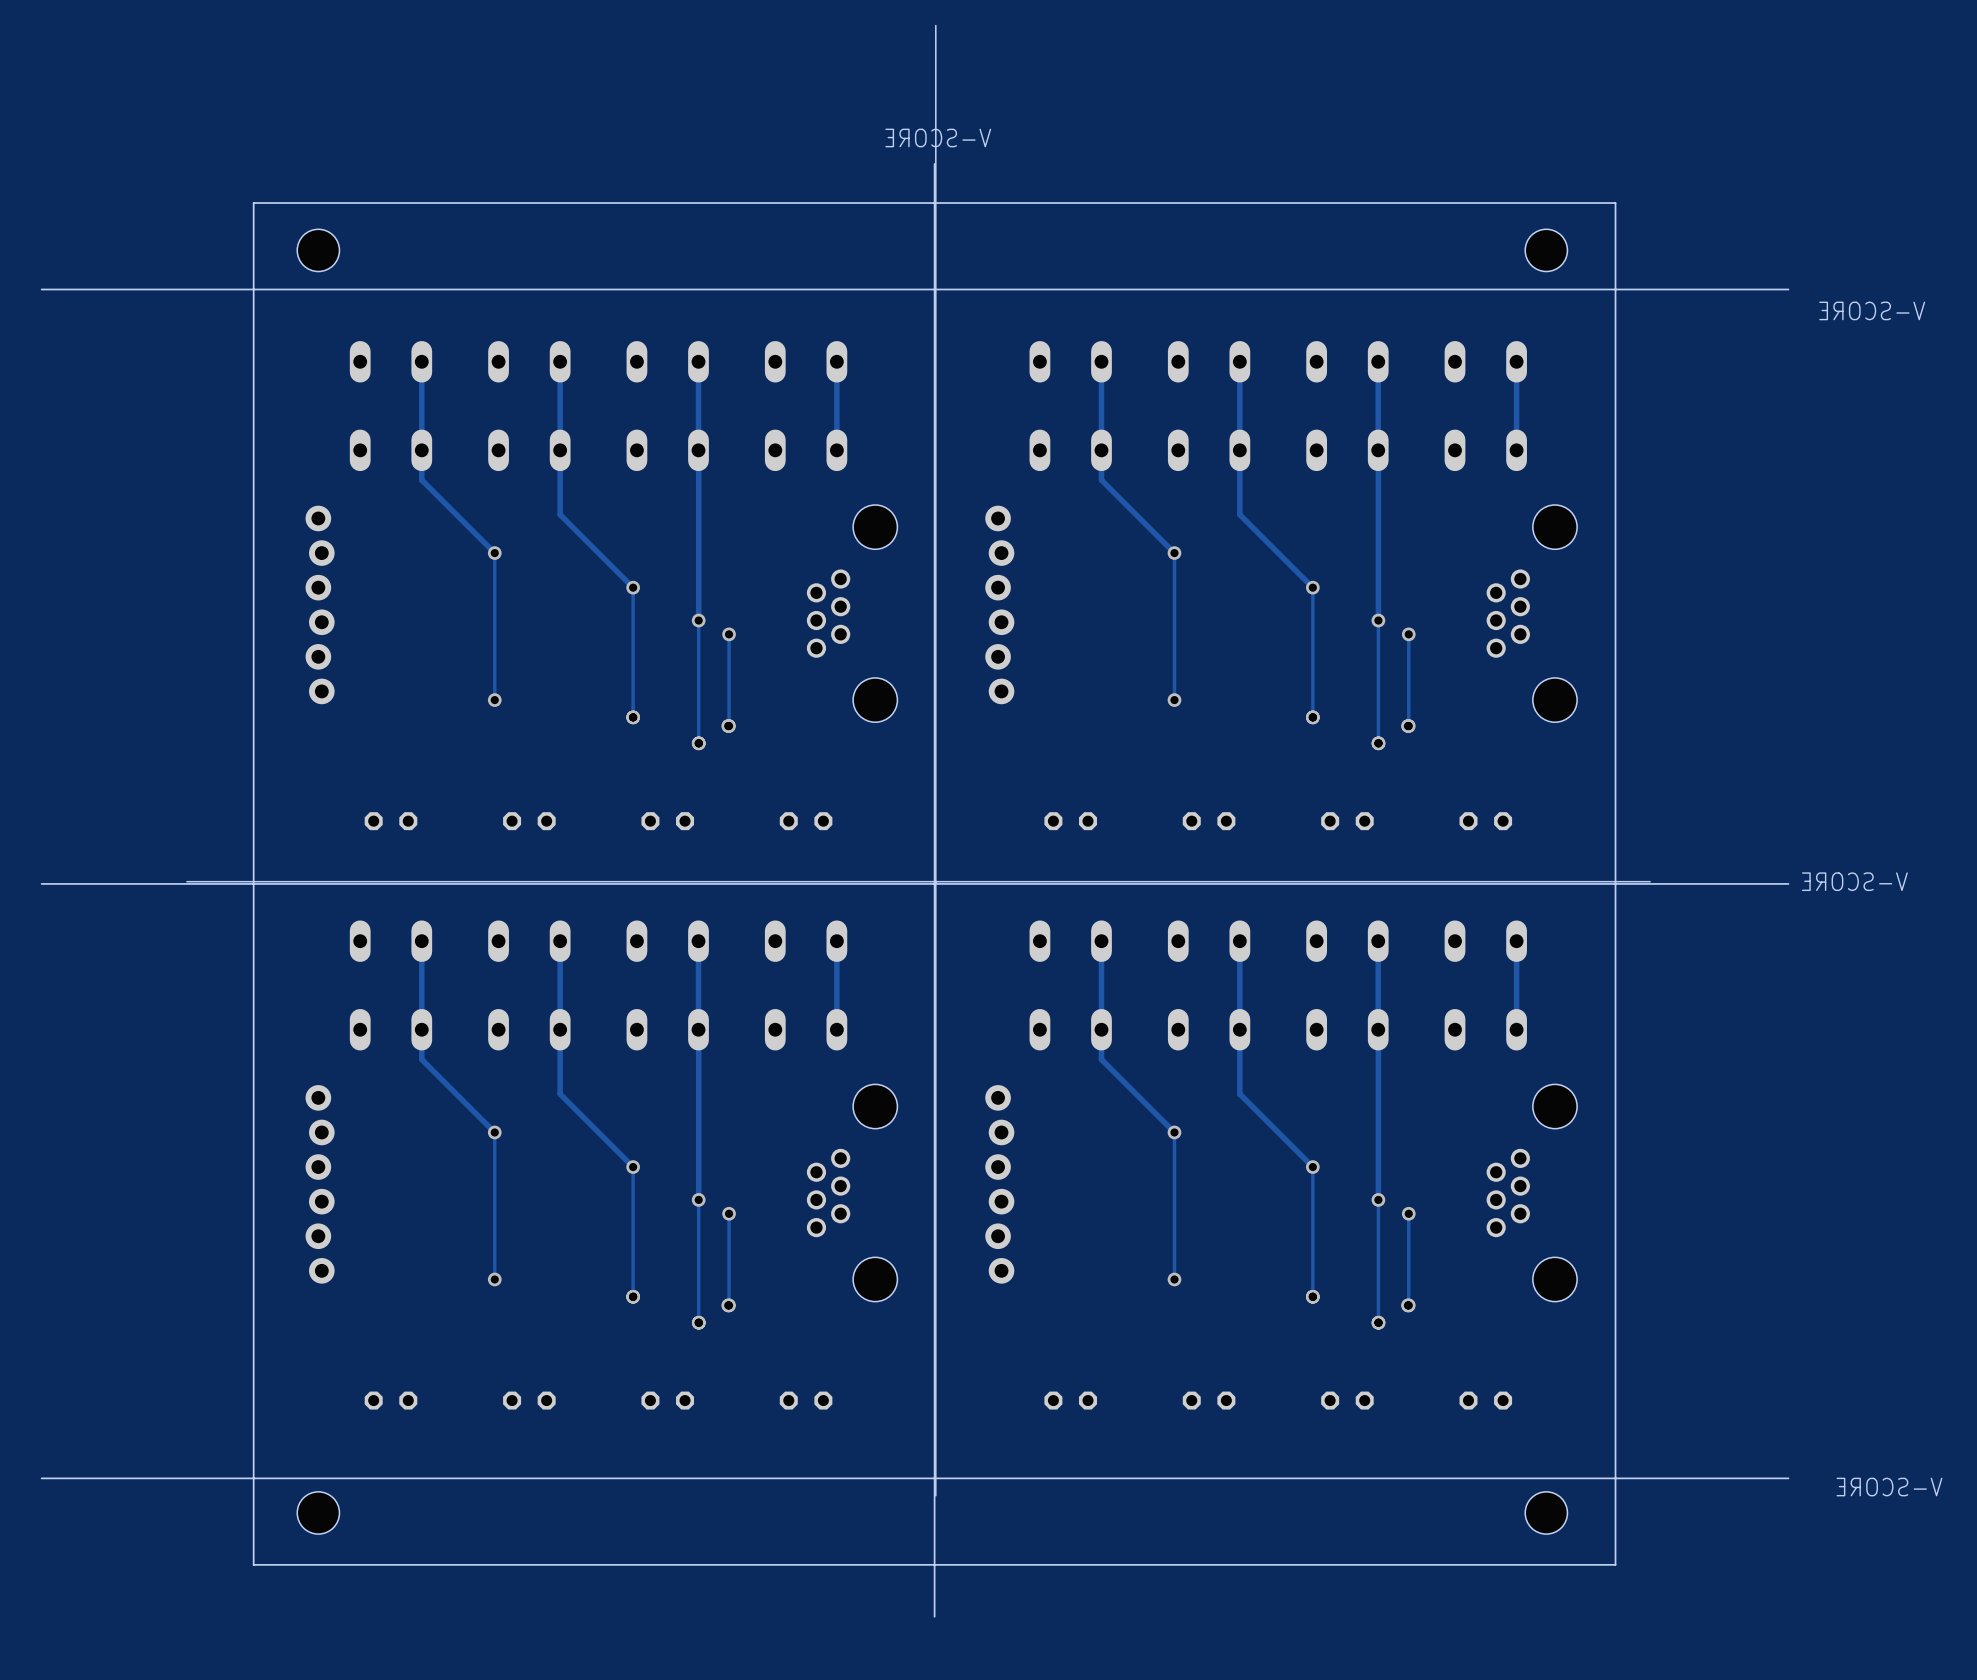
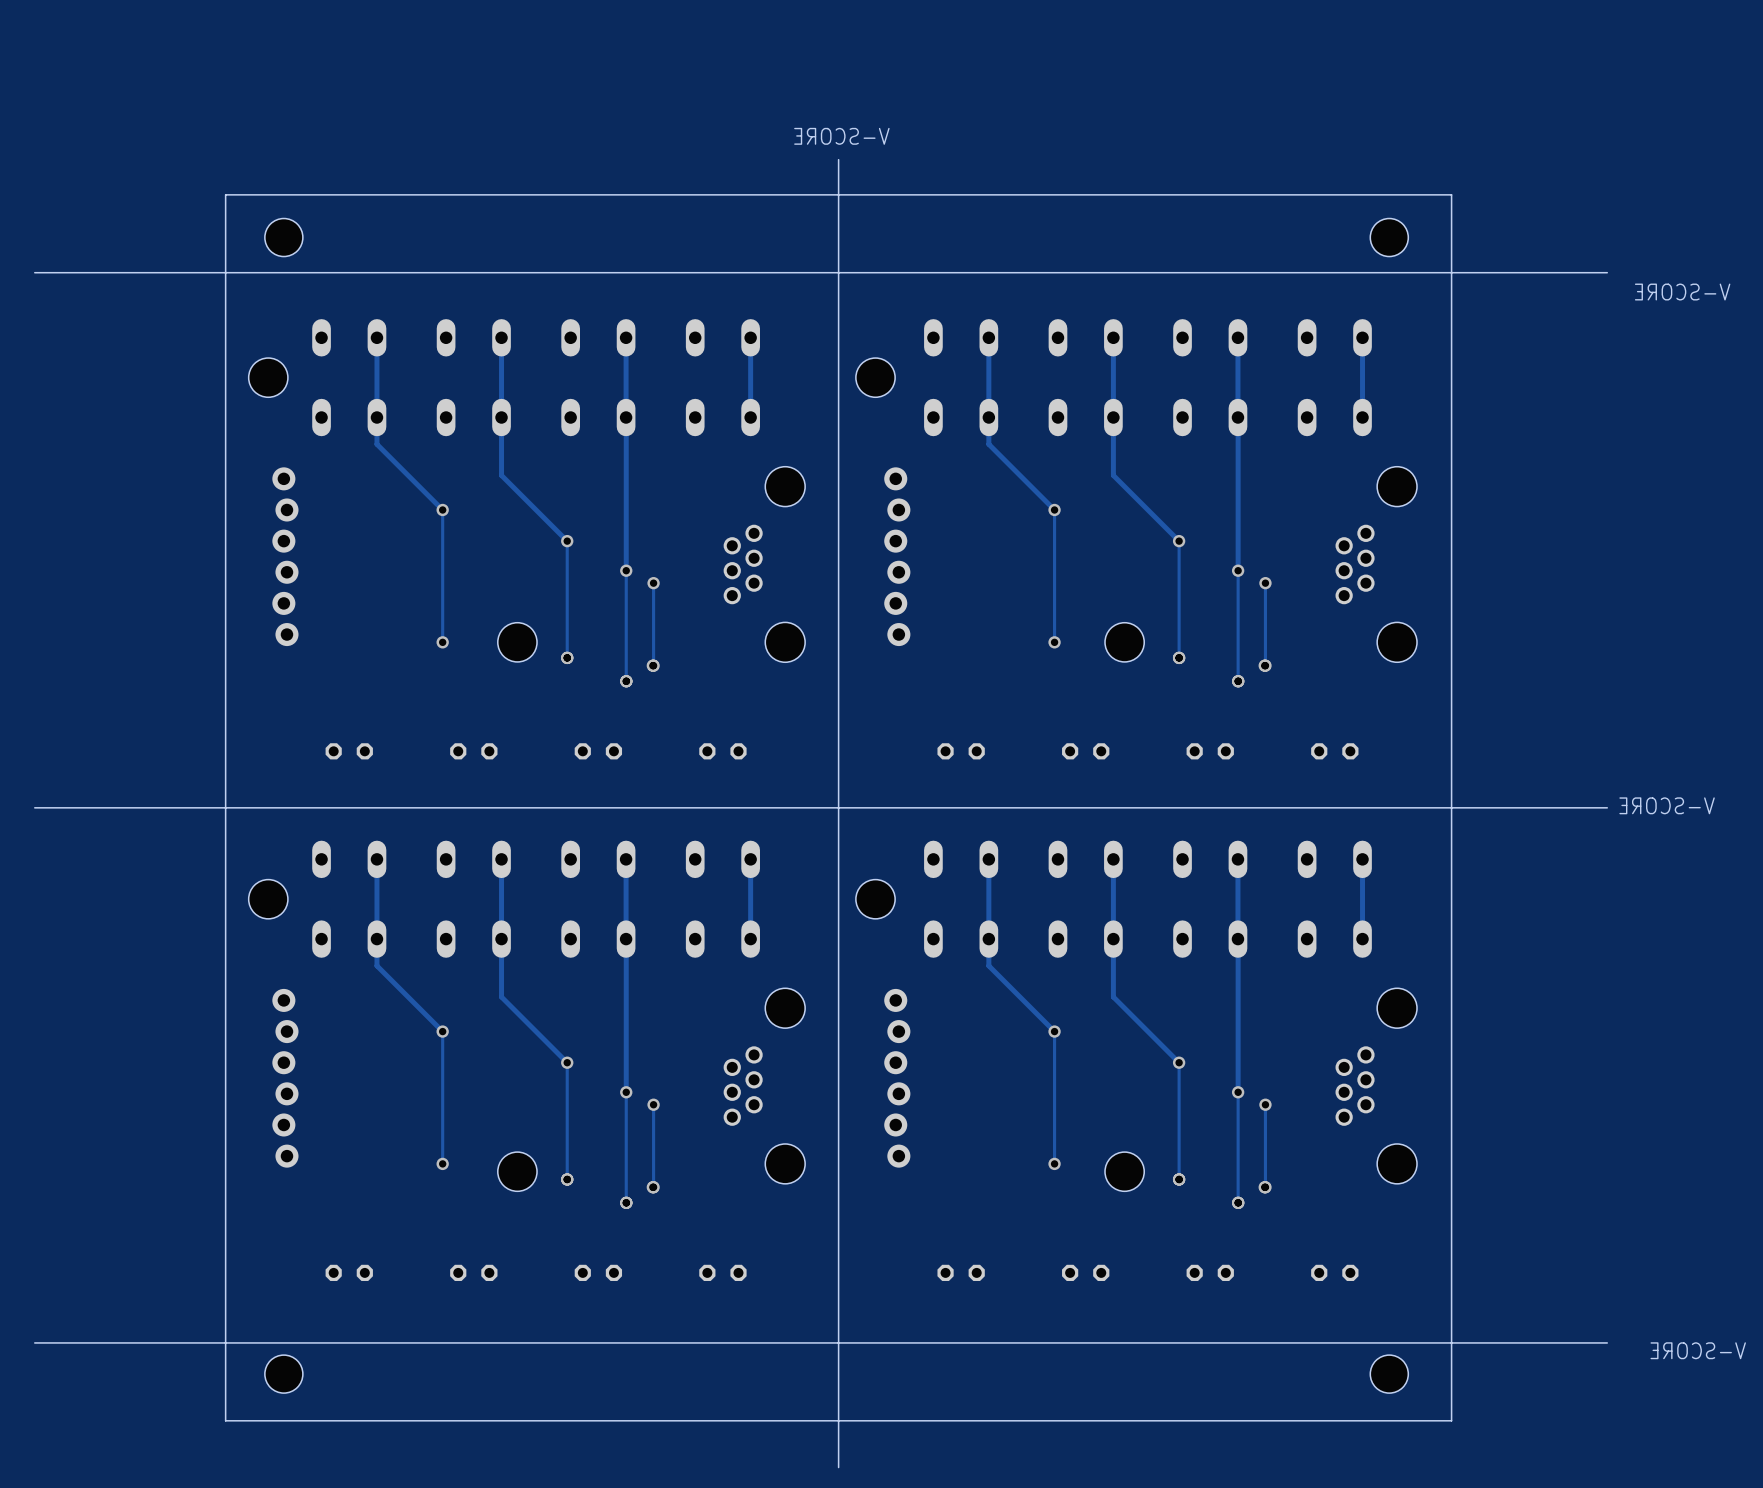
board edge: (935, 25) (935, 1495) -> none
hole: none -> (268, 377)
hole: none -> (875, 377)
hole: none -> (517, 642)
hole: none -> (1124, 642)
board edge: (1650, 881) (186, 881) -> none
hole: none -> (268, 899)
hole: none -> (875, 899)
hole: none -> (517, 1171)
hole: none -> (1124, 1171)

